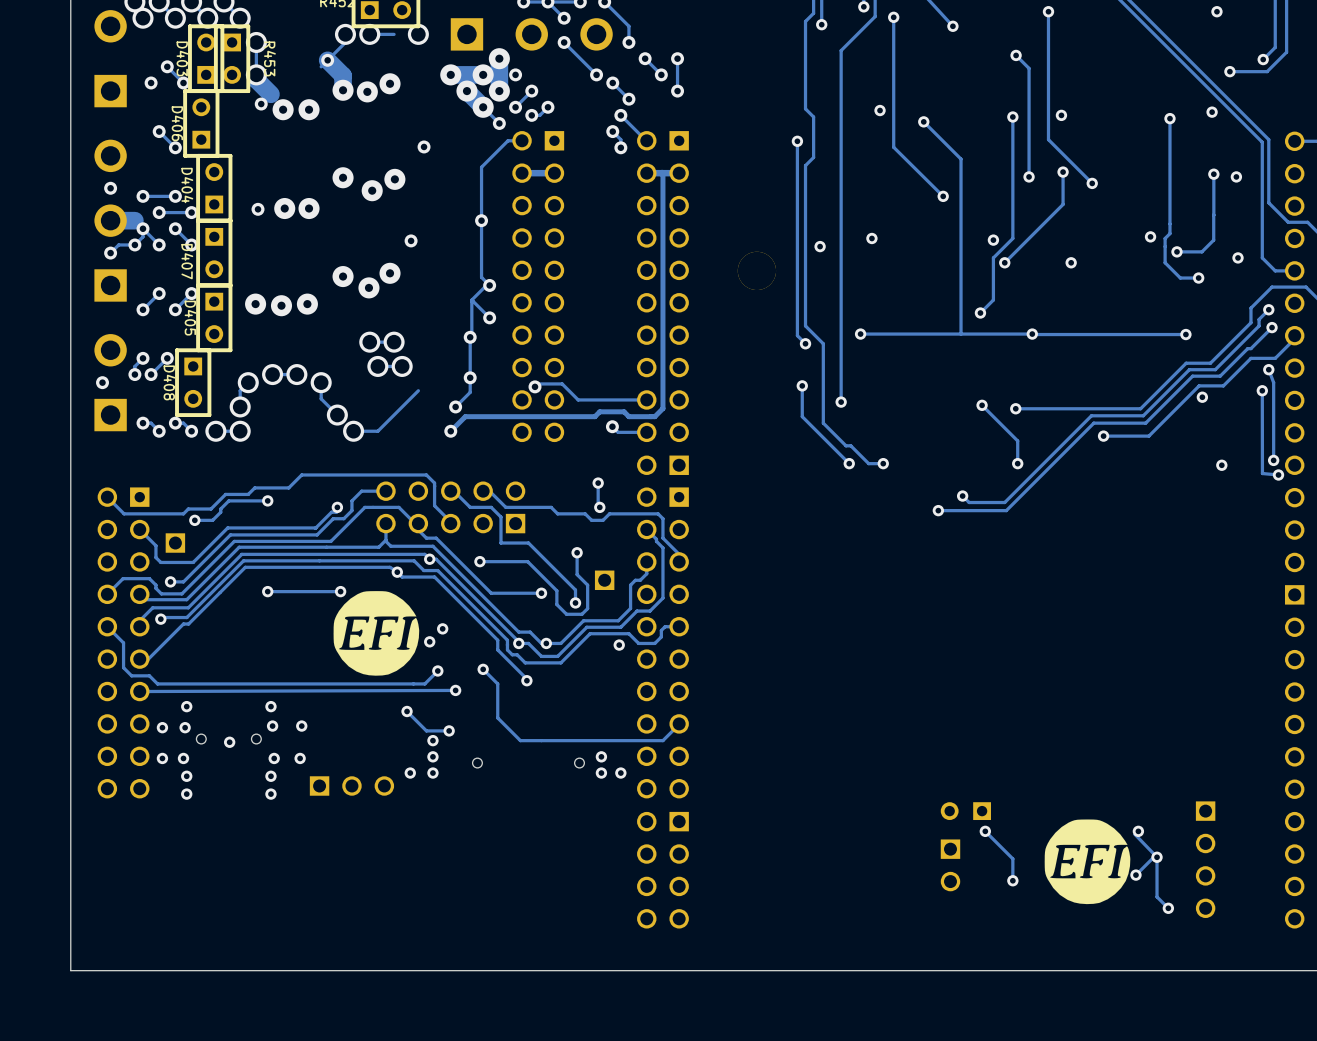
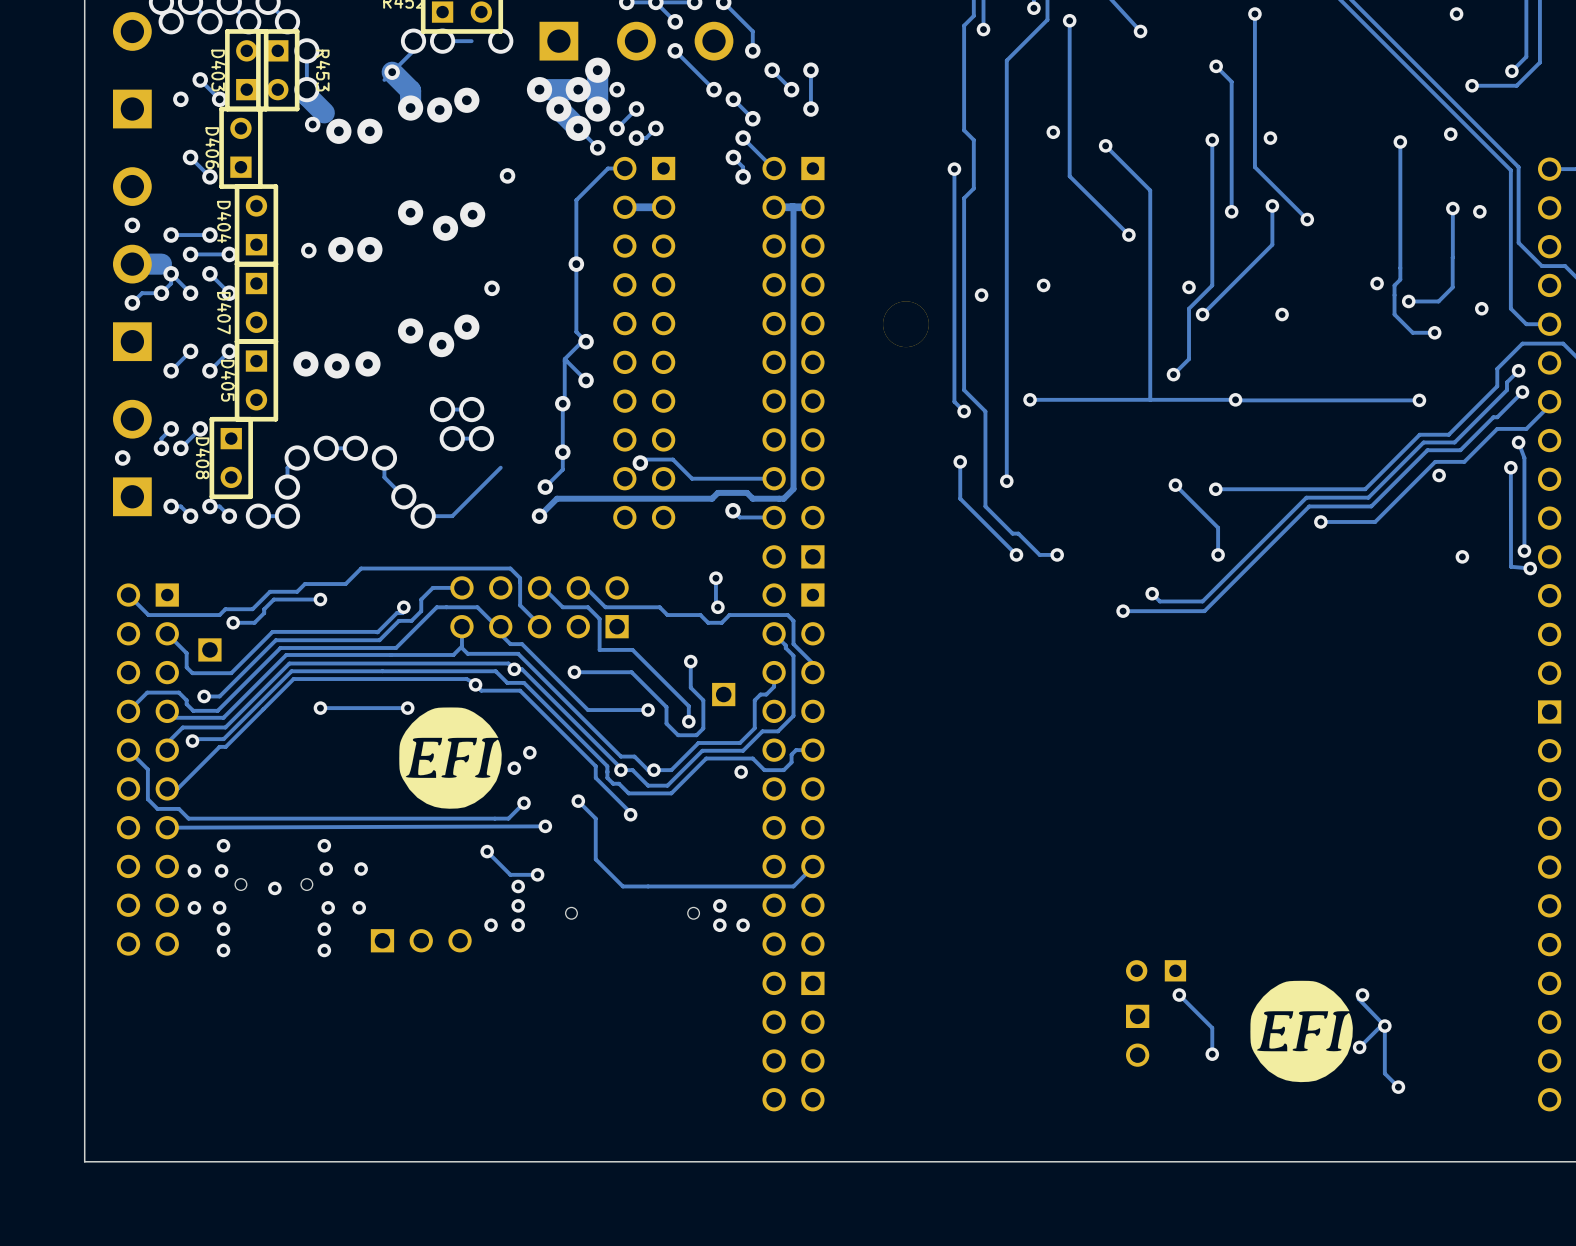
part: (1205, 859) -> none

